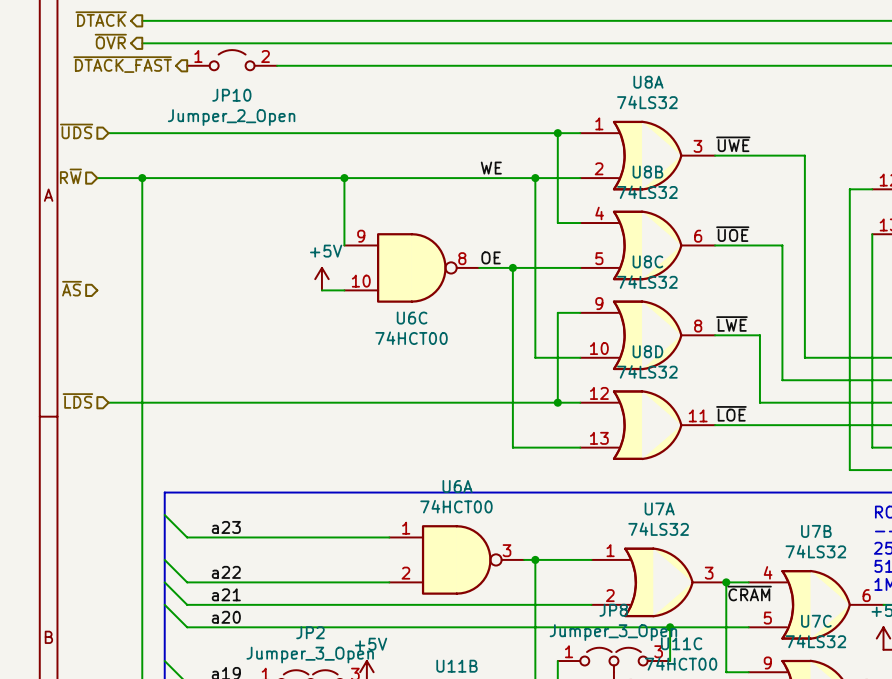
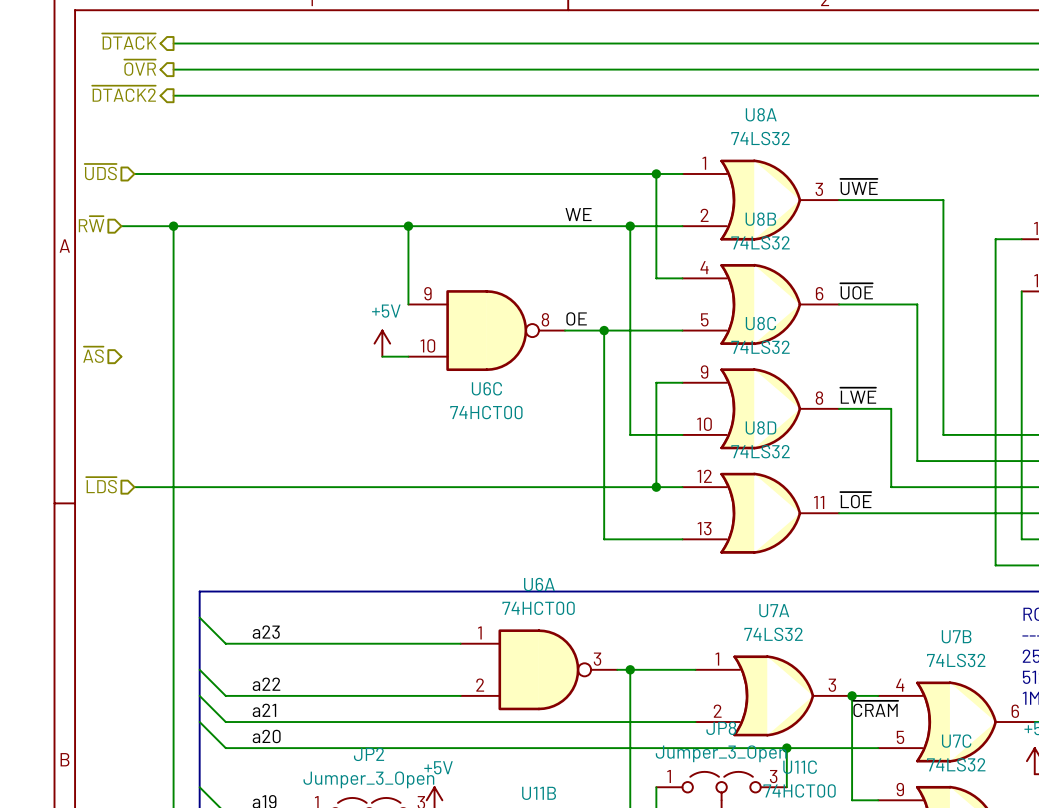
JP10: Jumper_2_Open (232, 60) -> none
hierarchical label: ~{DTACK_FAST} (122, 64) -> ~{DTACK2} (124, 93)
wire: none -> (173, 95) (330, 95)

